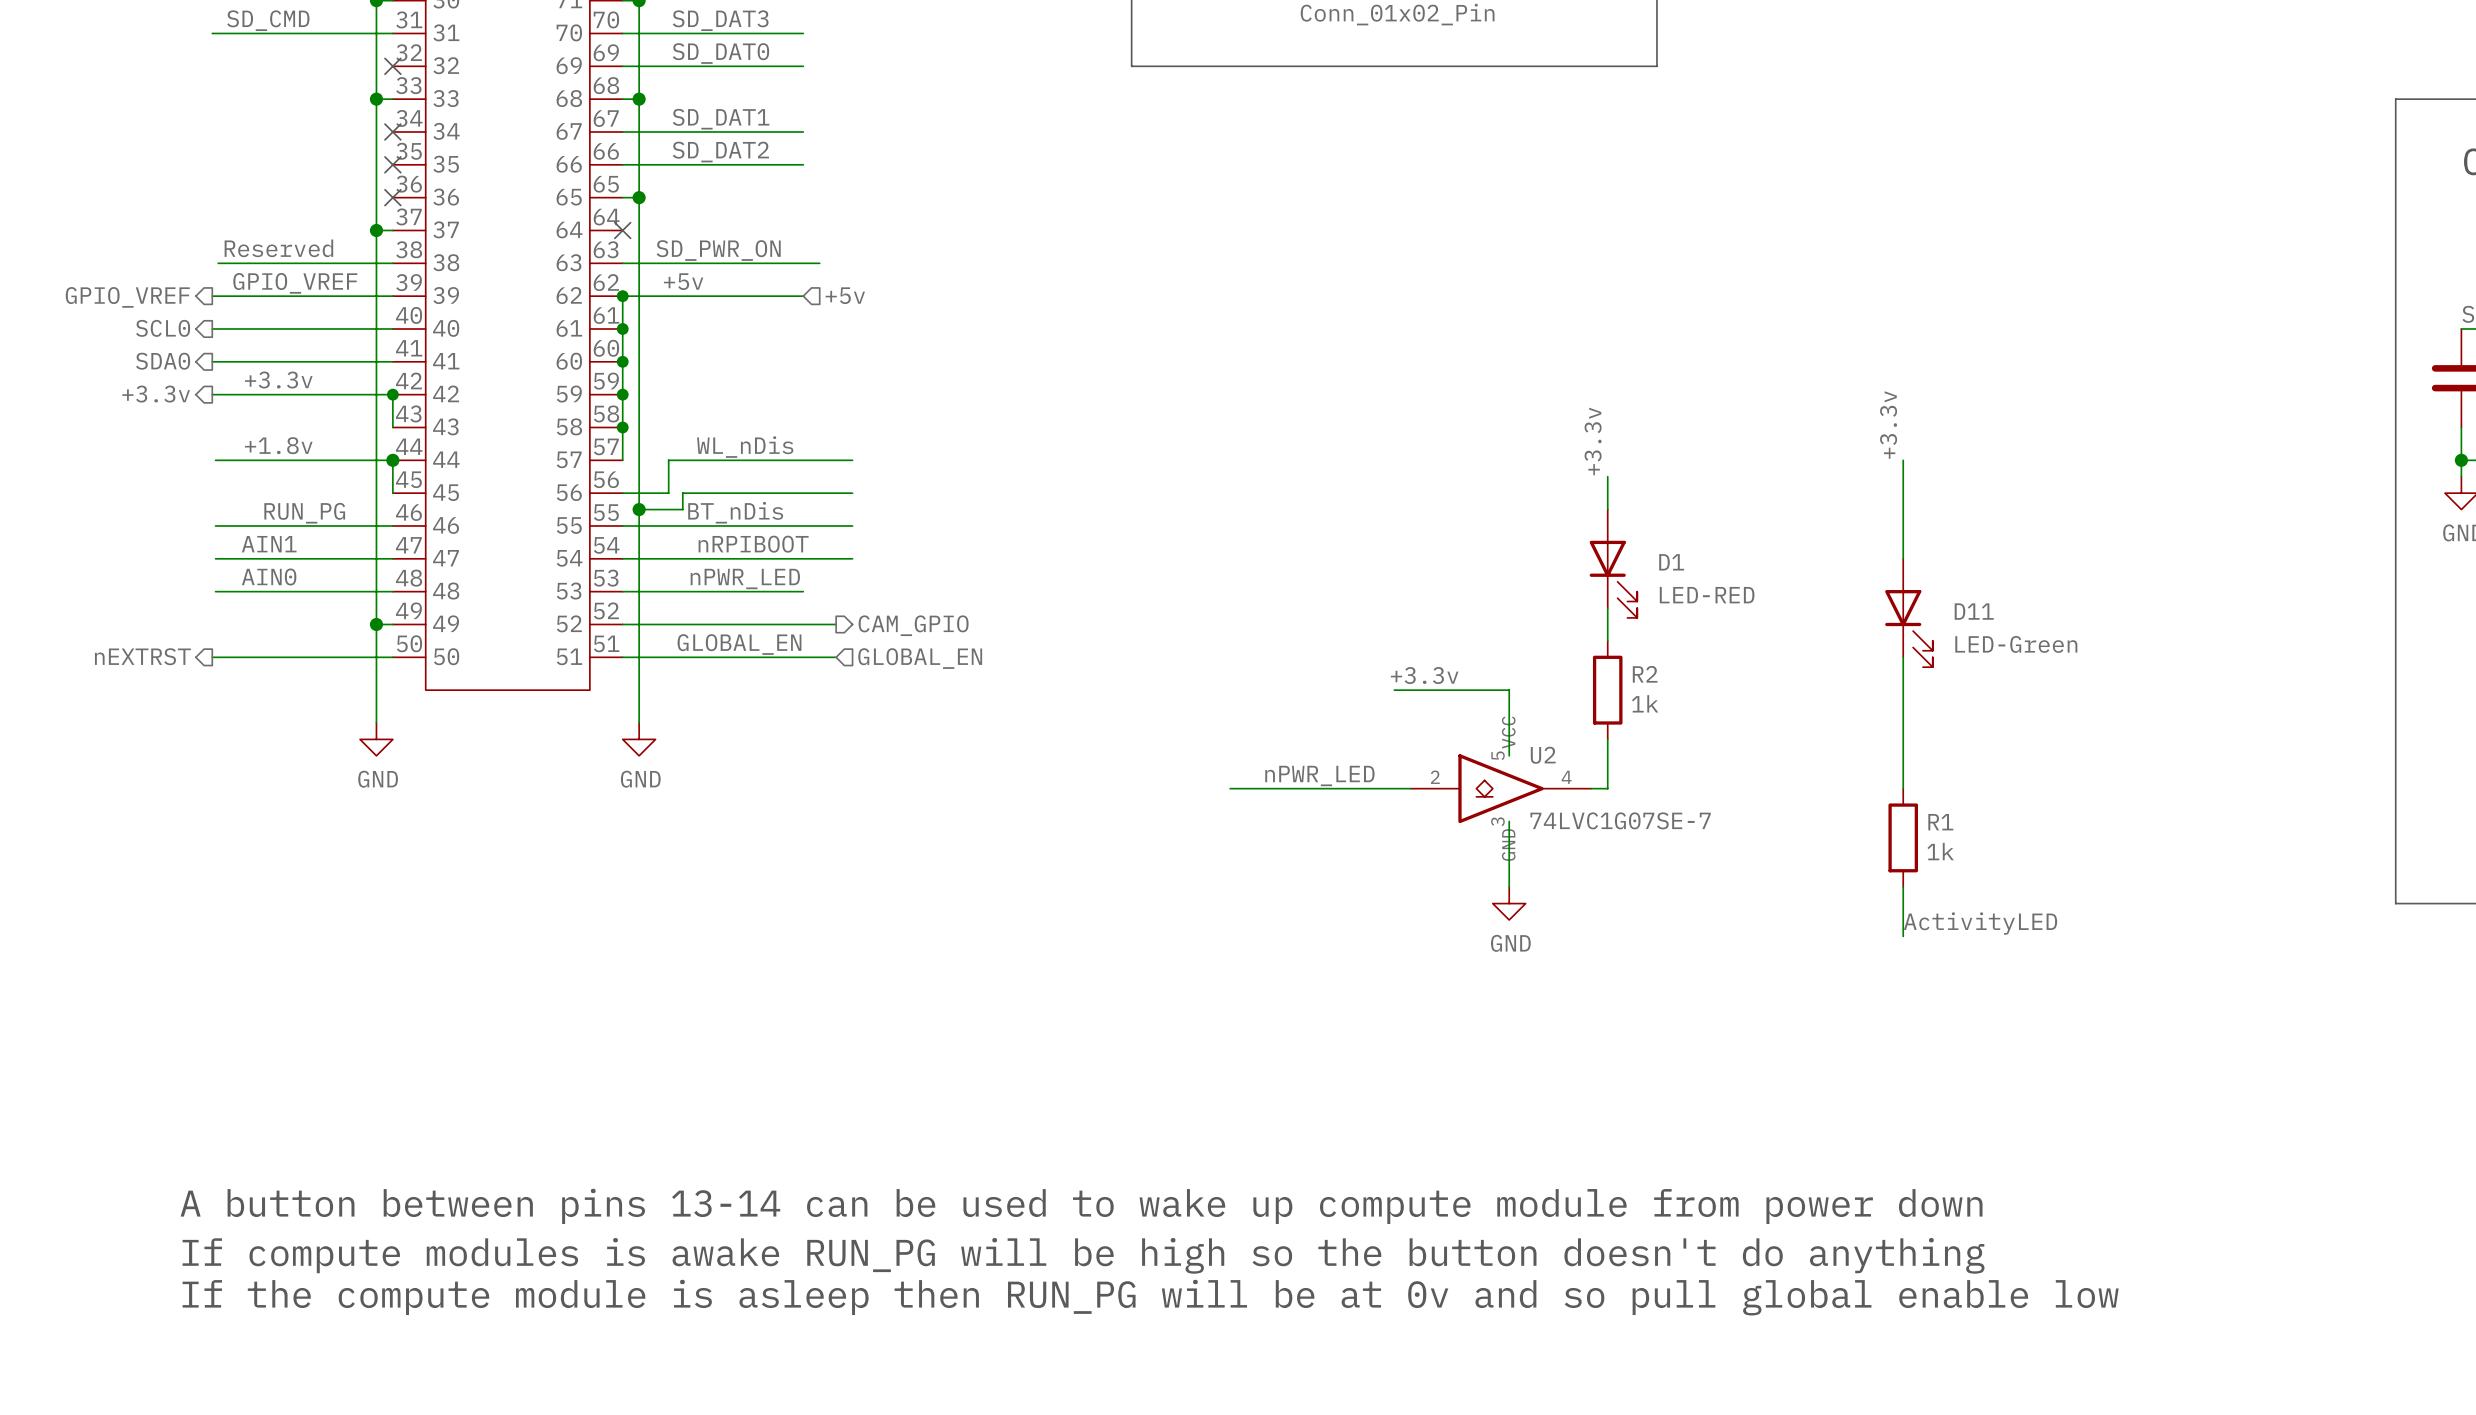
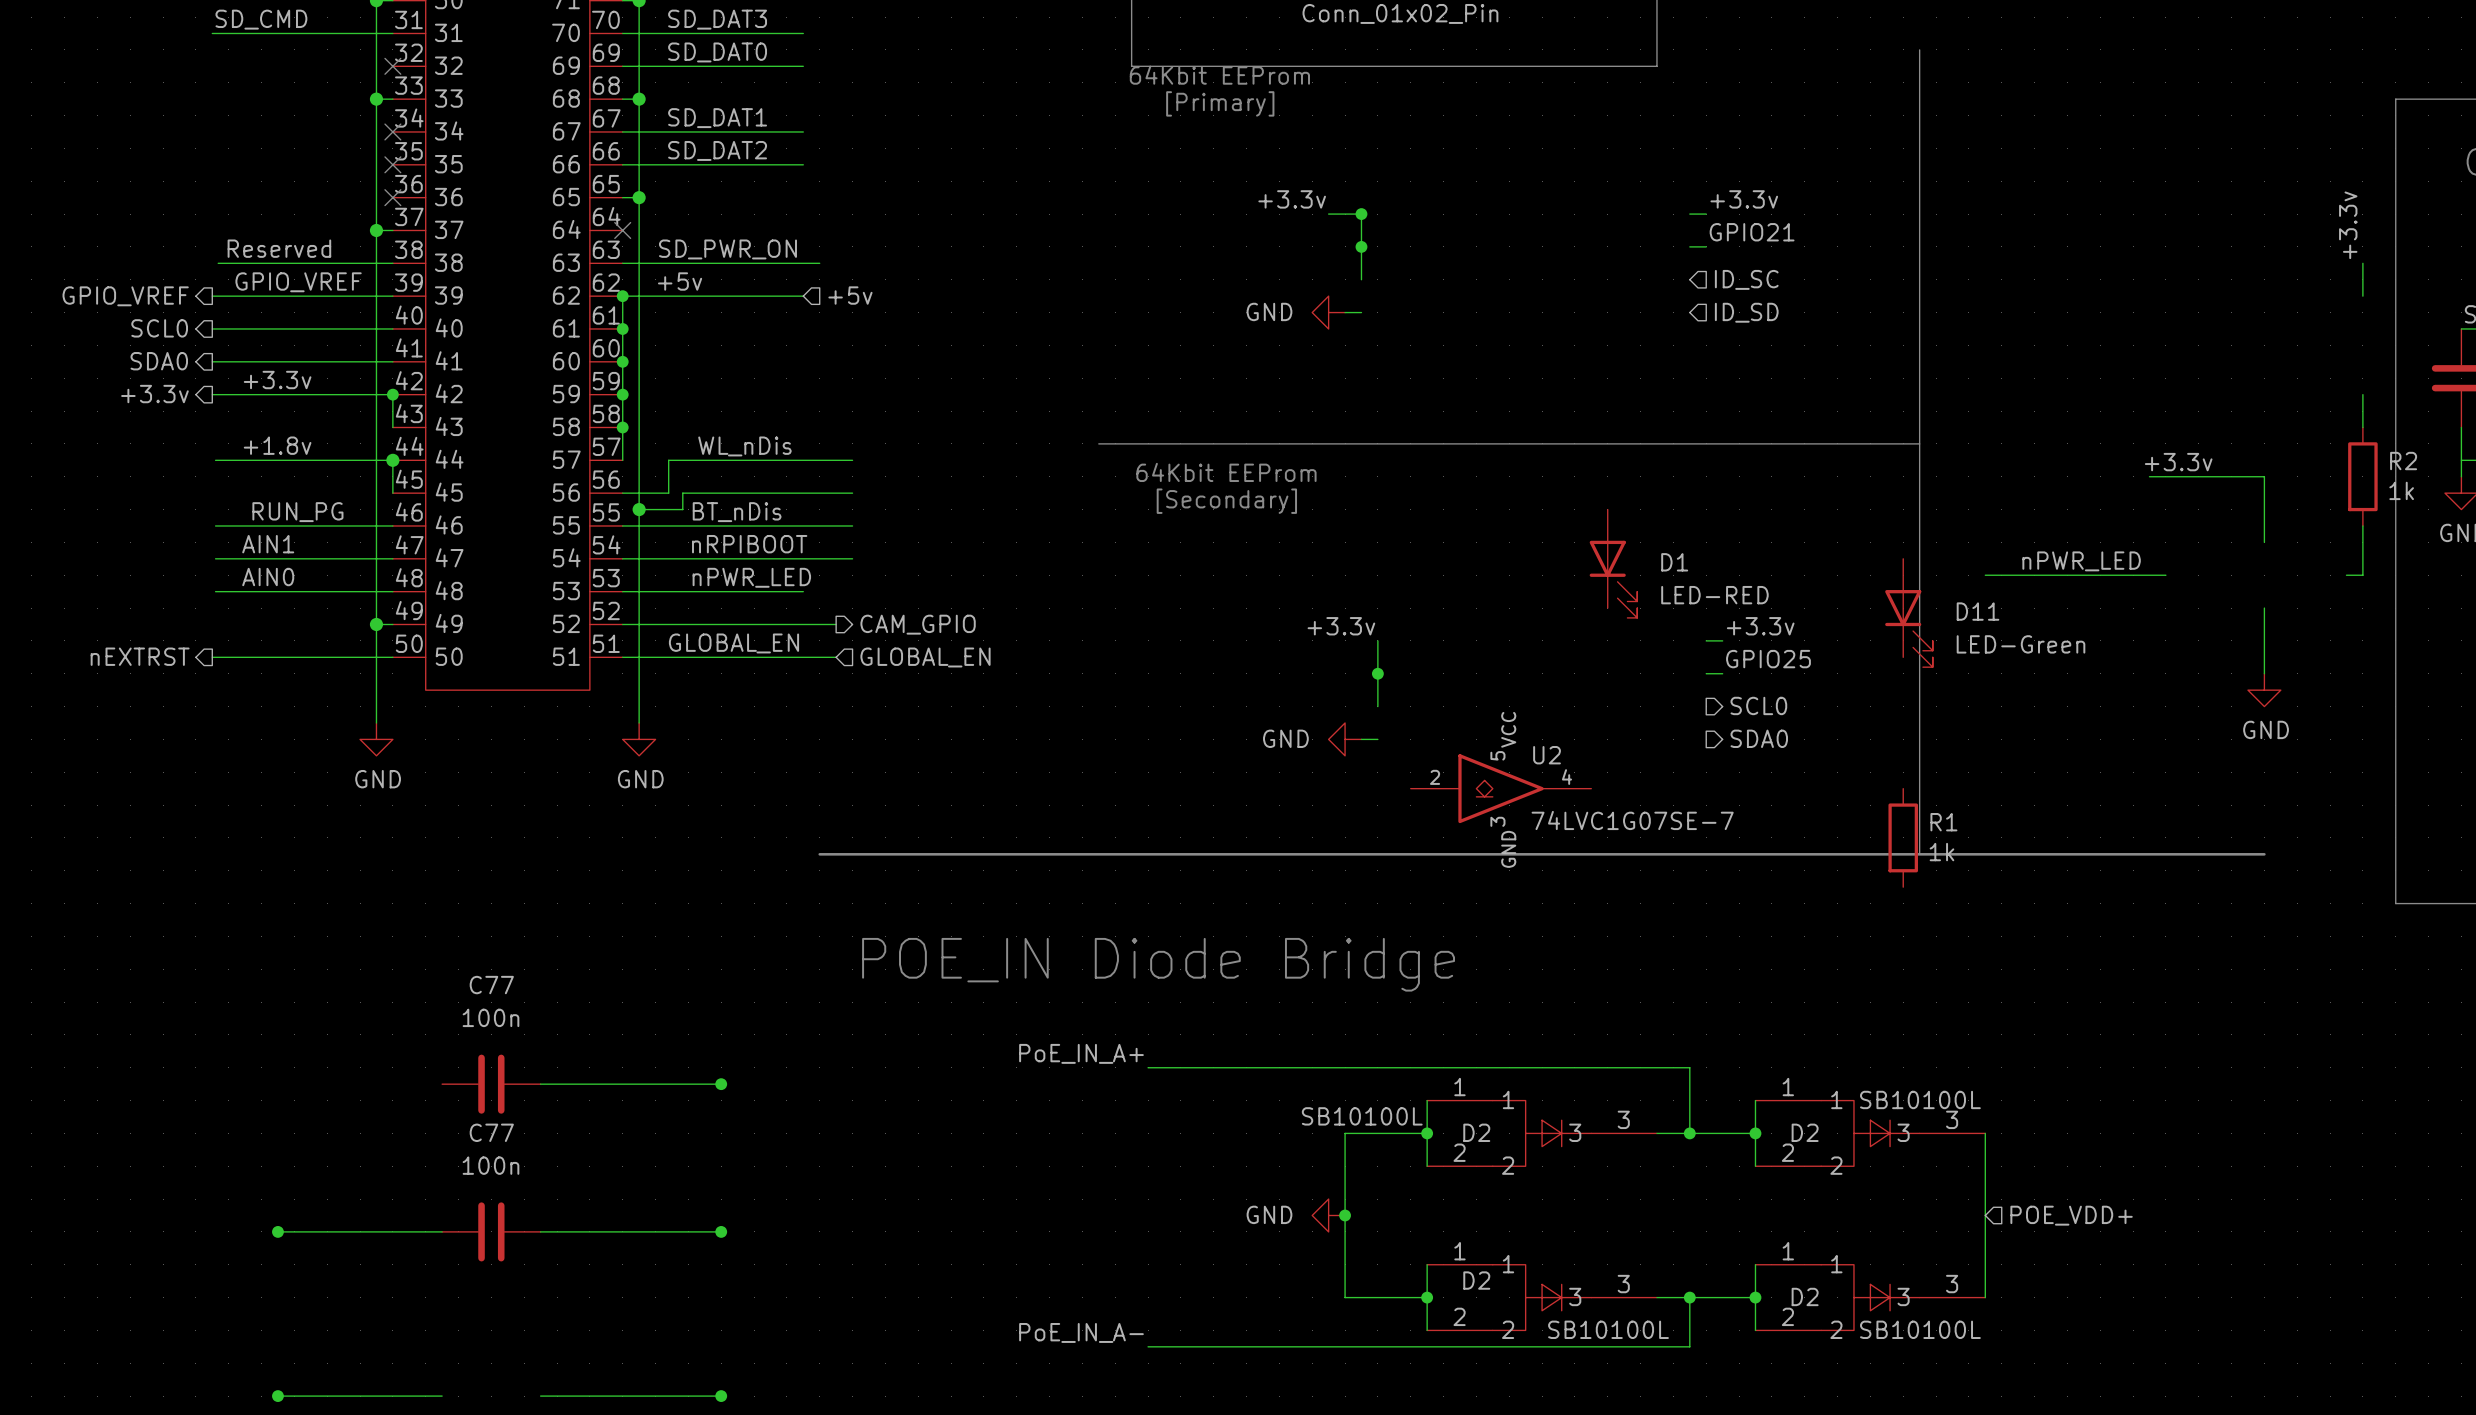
line: none -> (1919, 49) (1919, 854)
text: none -> 64Kbit EEProm (1219, 75)
text: none -> [Primary] (1220, 103)
label: none -> +3.3v (1292, 199)
label: none -> +3.3v (1744, 199)
wire: none -> (1328, 214) (1361, 214) (1361, 279)
junction: none -> (1361, 214)
wire: none -> (1689, 214) (1706, 214)
label: none -> +3.3v (2348, 225)
label: none -> GPIO21 (1752, 232)
junction: none -> (1361, 246)
wire: none -> (1689, 246) (1706, 246)
wire: none -> (2362, 263) (2362, 296)
hierarchical label: none -> ID_SC (1746, 279)
power symbol: none -> GND (1328, 312)
wire: none -> (1345, 312) (1361, 312)
hierarchical label: none -> ID_SD (1746, 312)
wire: none -> (2362, 394) (2362, 427)
label: +3.3v (1888, 425) -> none
label: +3.3v (1593, 441) -> none
line: none -> (1098, 443) (1919, 443)
wire: (1903, 460) (1903, 558) -> none
junction: (2461, 460) -> none
label: none -> +3.3v (2178, 462)
text: none -> 64Kbit EEProm (1226, 472)
wire: (1607, 476) (1607, 509) -> none
wire: none -> (2149, 476) (2264, 476) (2264, 542)
text: none -> [Secondary] (1226, 501)
wire: none -> (2362, 525) (2362, 575) (2346, 575)
label: none -> nPWR_LED (2081, 561)
wire: none -> (1985, 575) (2165, 575)
wire: (1607, 608) (1607, 640) -> none
wire: none -> (2264, 608) (2264, 673)
label: none -> +3.3v (1760, 626)
wire: none -> (1706, 640) (1722, 640)
wire: (1903, 657) (1903, 788) -> none
label: none -> GPIO25 (1768, 659)
junction: none -> (1377, 673)
wire: none -> (1706, 673) (1722, 673)
label position: +3.3v (1424, 675) -> +3.3v (1341, 626)
wire: (1394, 690) (1509, 690) (1509, 755) -> none
R2 position: (1607, 690) -> (2362, 476)
power symbol: none -> GND (2264, 690)
hierarchical label: none -> SCL0 (1758, 705)
hierarchical label: none -> SDA0 (1759, 738)
power symbol: none -> GND (1345, 739)
wire: none -> (1361, 739) (1377, 739)
wire: (1607, 739) (1607, 788) (1591, 788) -> none
label: nPWR_LED (1319, 775) -> none
wire: (1230, 788) (1410, 788) -> none
wire: (1509, 821) (1509, 887) -> (1377, 640) (1377, 706)
line: none -> (819, 854) (2264, 854)
wire: (1903, 887) (1903, 936) -> none
power symbol: GND (1509, 903) -> none
label: ActivityLED (1980, 923) -> none
text: none -> POE_IN Diode Bridge (1158, 964)
label: none -> PoE_IN_A+ (1081, 1053)
wire: none -> (1148, 1067) (1689, 1067) (1689, 1133)
C77: none -> 100n (491, 1084)
wire: none -> (540, 1084) (721, 1084)
junction: none -> (721, 1084)
wire: none -> (1427, 1100) (1427, 1166)
wire: none -> (1755, 1100) (1755, 1166)
wire: none -> (1427, 1133) (1345, 1133) (1345, 1297) (1427, 1297)
junction: none -> (1427, 1133)
D2: none -> SB10100L (1542, 1133)
wire: none -> (1656, 1133) (1755, 1133)
junction: none -> (1689, 1133)
junction: none -> (1755, 1133)
D2: none -> SB10100L (1870, 1133)
wire: none -> (1985, 1133) (1985, 1297)
text: A button between pins 13-14 can be used to wake up compute module from power down (1081, 1206) -> none
power symbol: none -> GND (1328, 1215)
junction: none -> (1345, 1215)
hierarchical label: none -> POE_VDD+ (2071, 1215)
wire: none -> (277, 1231) (442, 1231)
junction: none -> (277, 1231)
C77: none -> 100n (491, 1231)
wire: none -> (540, 1231) (721, 1231)
junction: none -> (721, 1231)
text: If compute modules is awake RUN_PG will be high so the button doesn't do anything (1083, 1255) -> none
wire: none -> (1427, 1264) (1427, 1330)
wire: none -> (1755, 1264) (1755, 1330)
text: If the compute module is asleep then RUN_PG will be at 0v and so pull global enable low (1150, 1297) -> none
junction: none -> (1427, 1297)
D2: none -> SB10100L (1542, 1297)
wire: none -> (1656, 1297) (1755, 1297)
wire: none -> (1689, 1297) (1689, 1346) (1148, 1346)
junction: none -> (1689, 1297)
junction: none -> (1755, 1297)
D2: none -> SB10100L (1870, 1297)
label: none -> PoE_IN_A- (1081, 1332)
wire: none -> (277, 1396) (442, 1396)
junction: none -> (277, 1396)
wire: none -> (540, 1396) (721, 1396)
junction: none -> (721, 1396)

